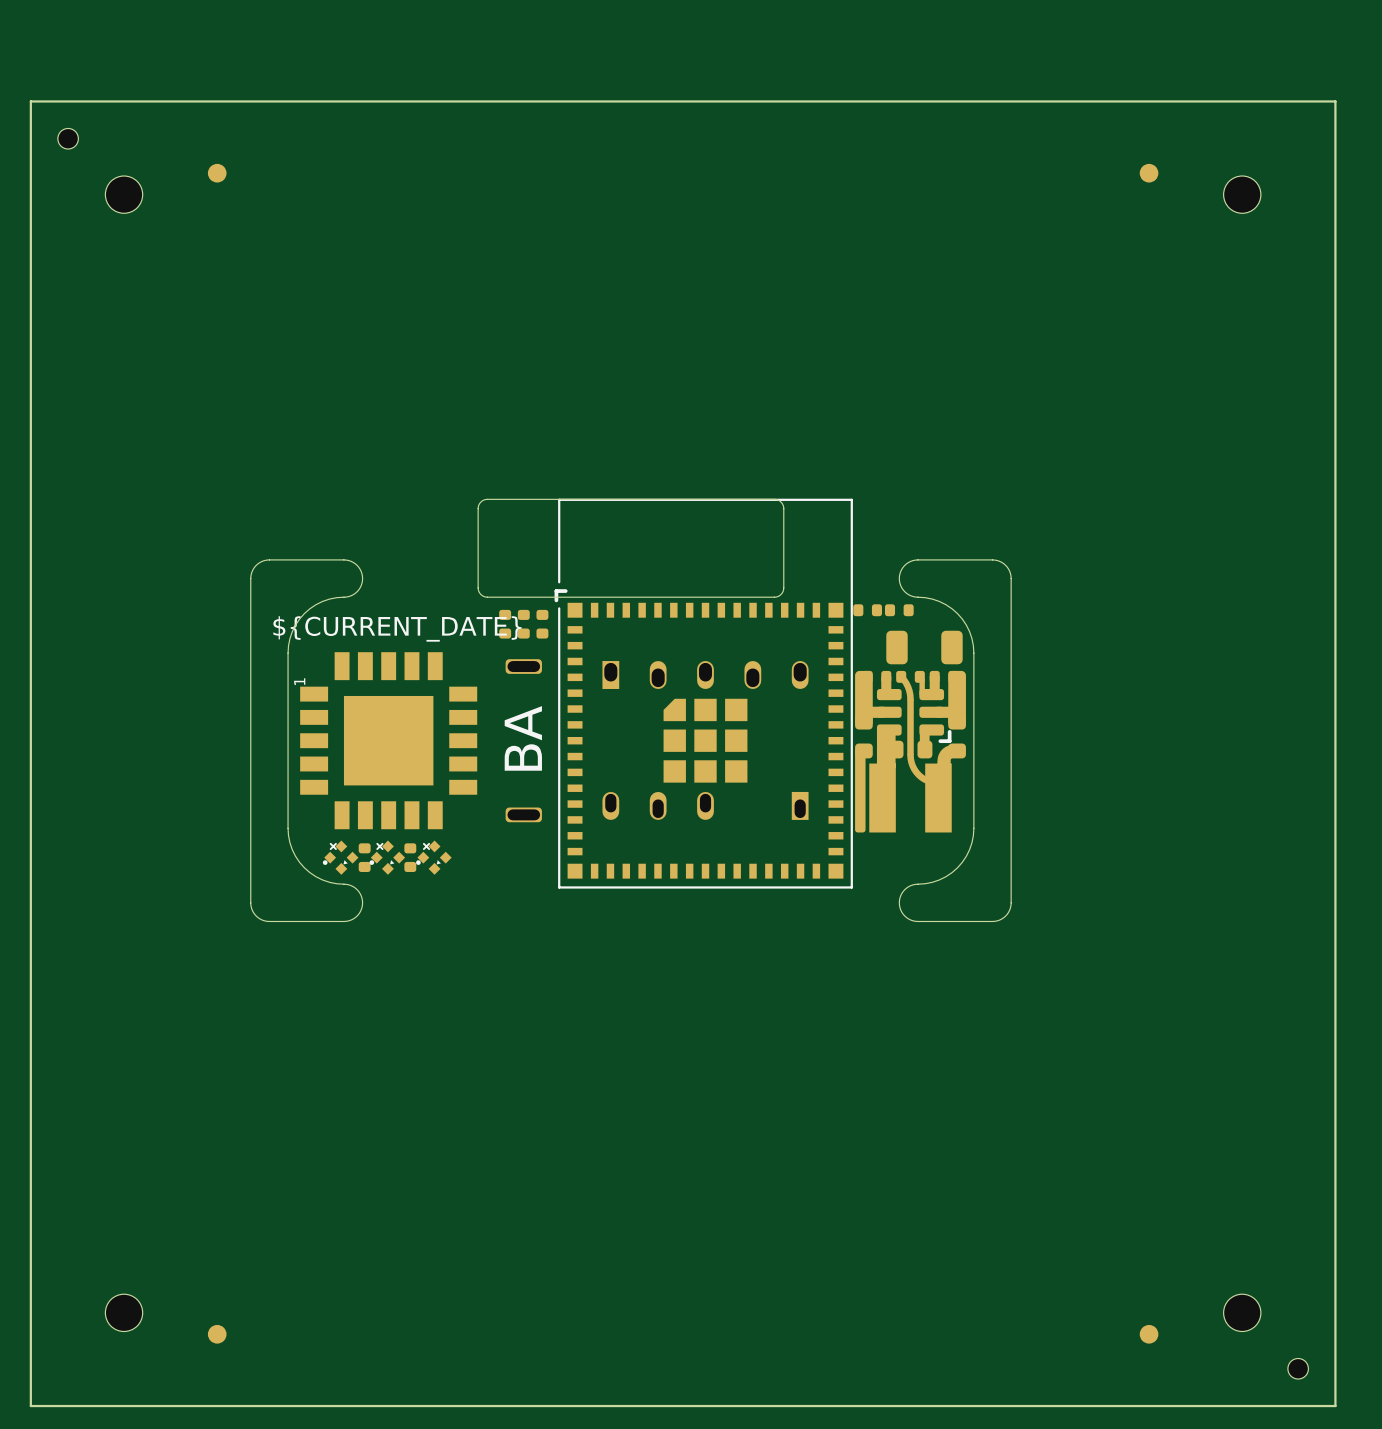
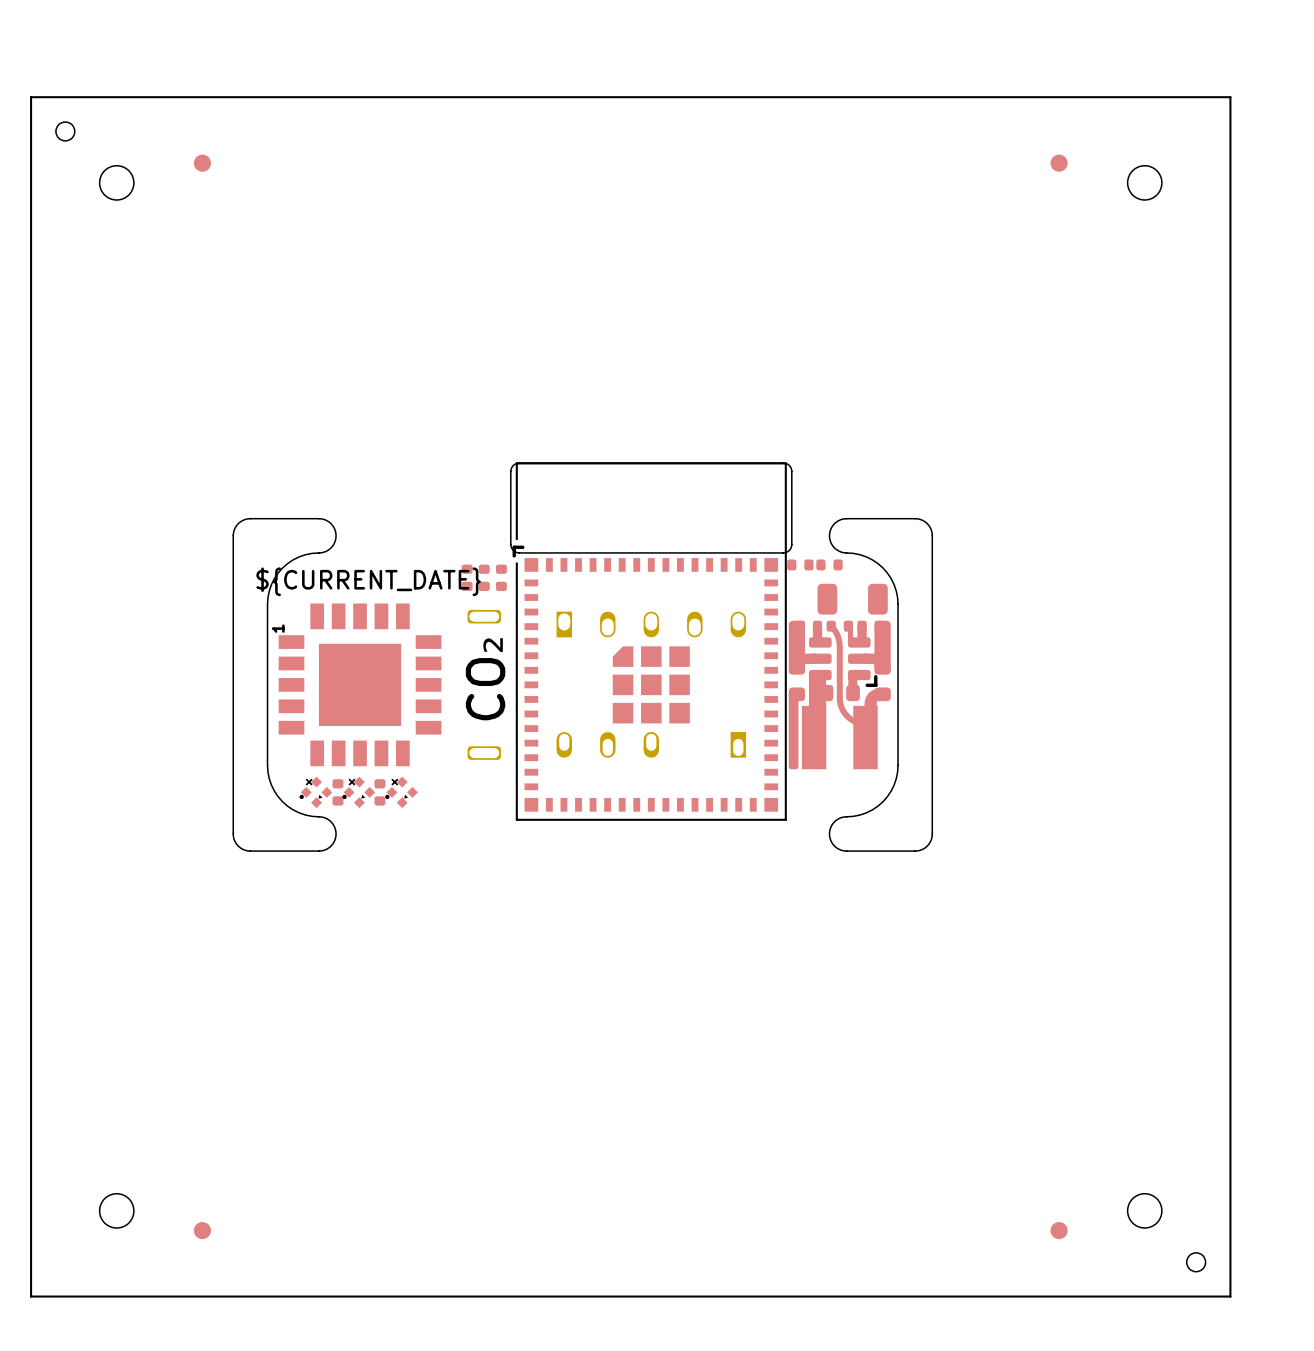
board edge: (562, 499) (486, 499) (480, 502) (478, 508) (478, 587) (480, 594) (487, 597) (562, 597) -> (519, 463) (513, 465) (510, 471) (510, 545) (513, 550) (519, 552)
board edge: (774, 499) (781, 502) (783, 508) (783, 589) (781, 594) (774, 597) -> (714, 463) (784, 463) (789, 465) (791, 471) (791, 544) (789, 550) (783, 552) (714, 552)
text: BA (523, 738) -> CO₂ (485, 677)

